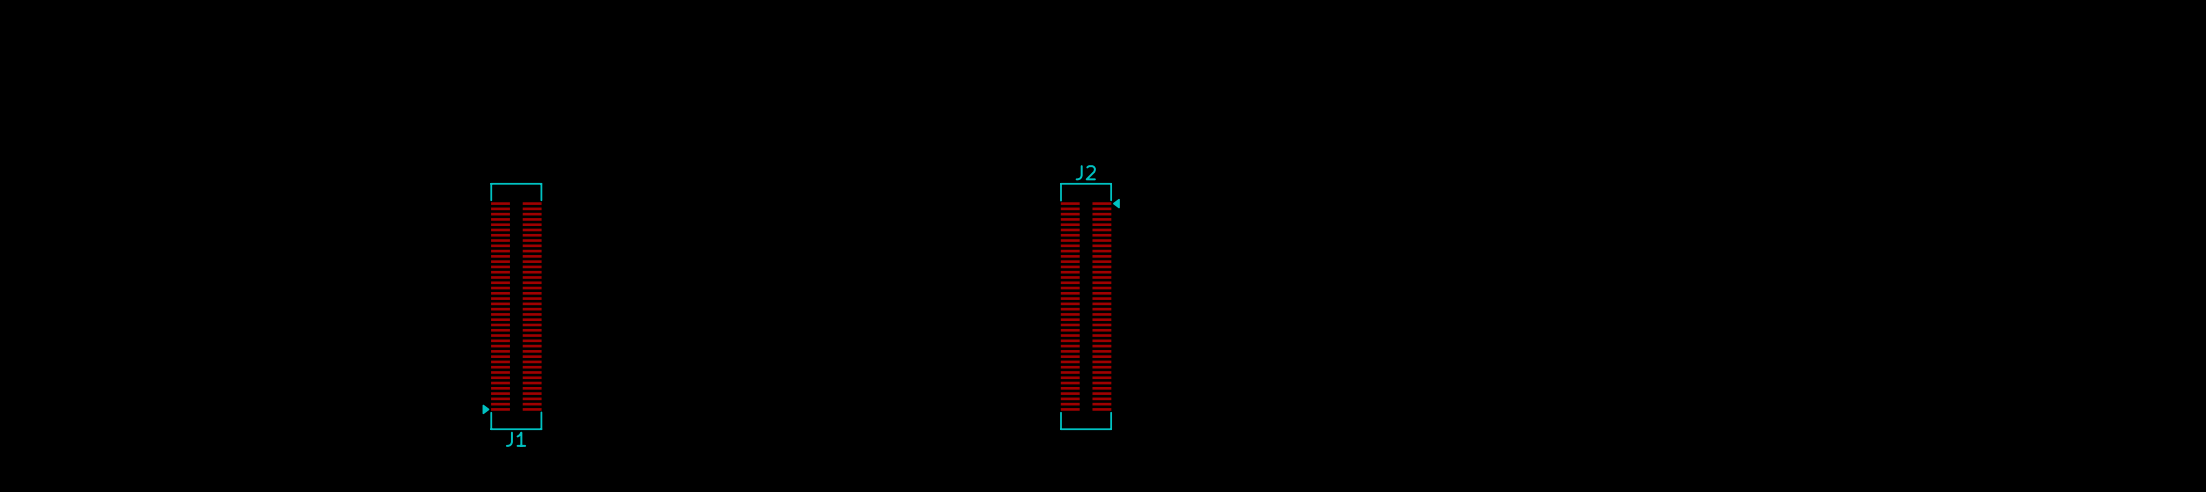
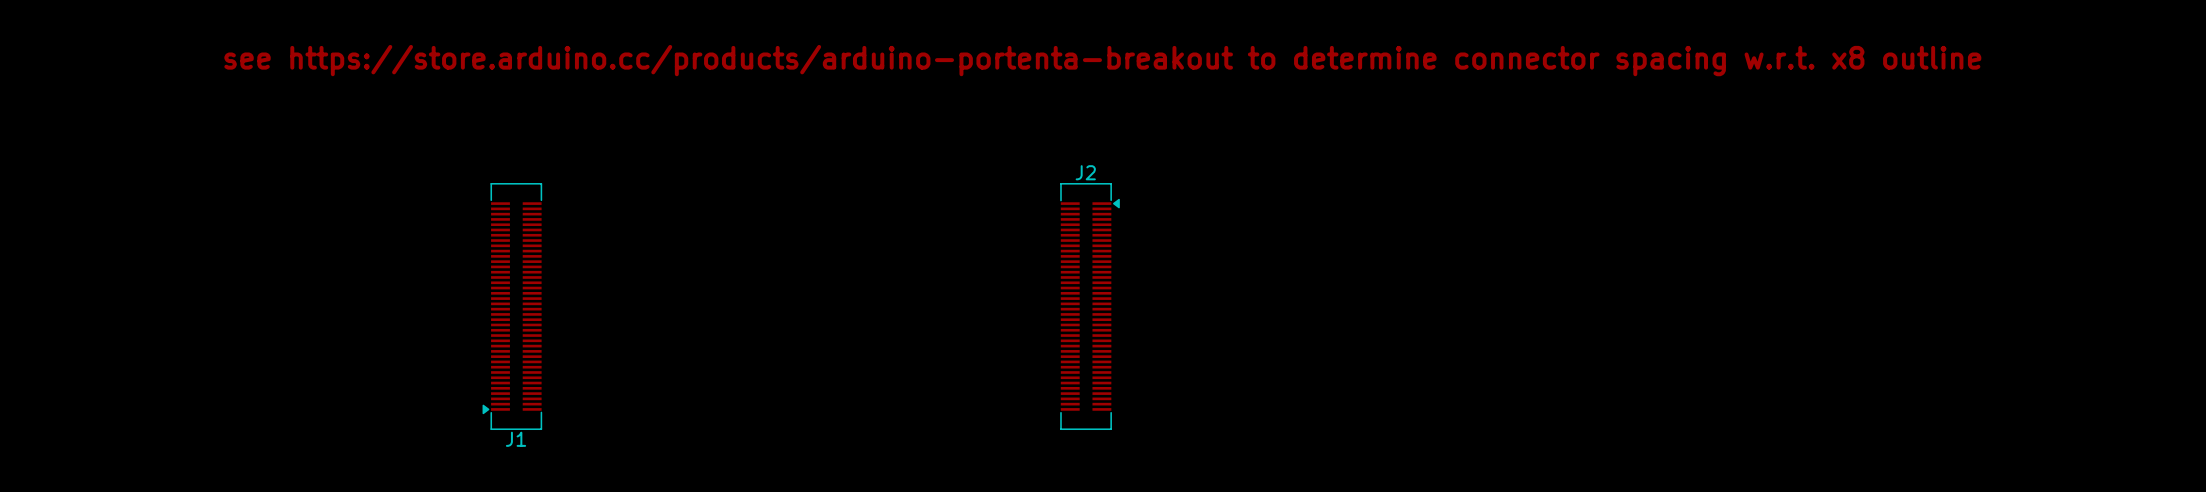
text: none -> see https://store.arduino.cc/products/arduino-portenta-breakout to determine connector spacing w.r.t. x8 outline (1102, 60)

